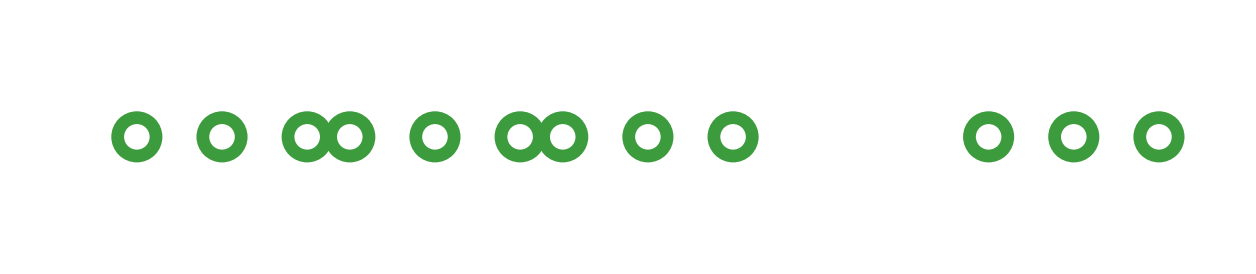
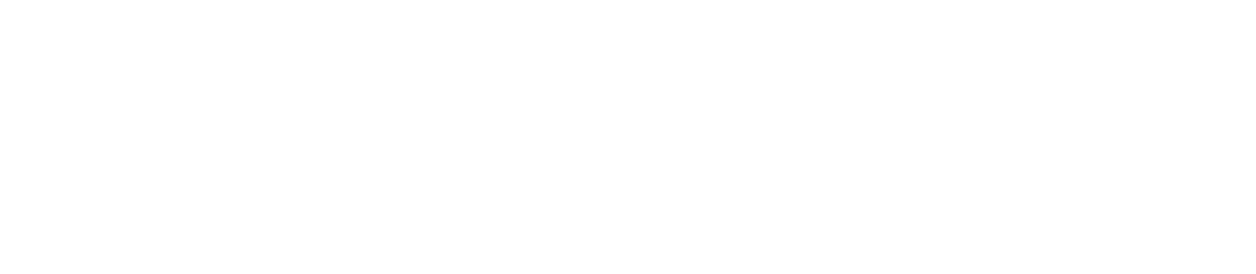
part: (222, 136) -> none
part: (434, 136) -> none
part: (647, 136) -> none
part: (1073, 136) -> none

